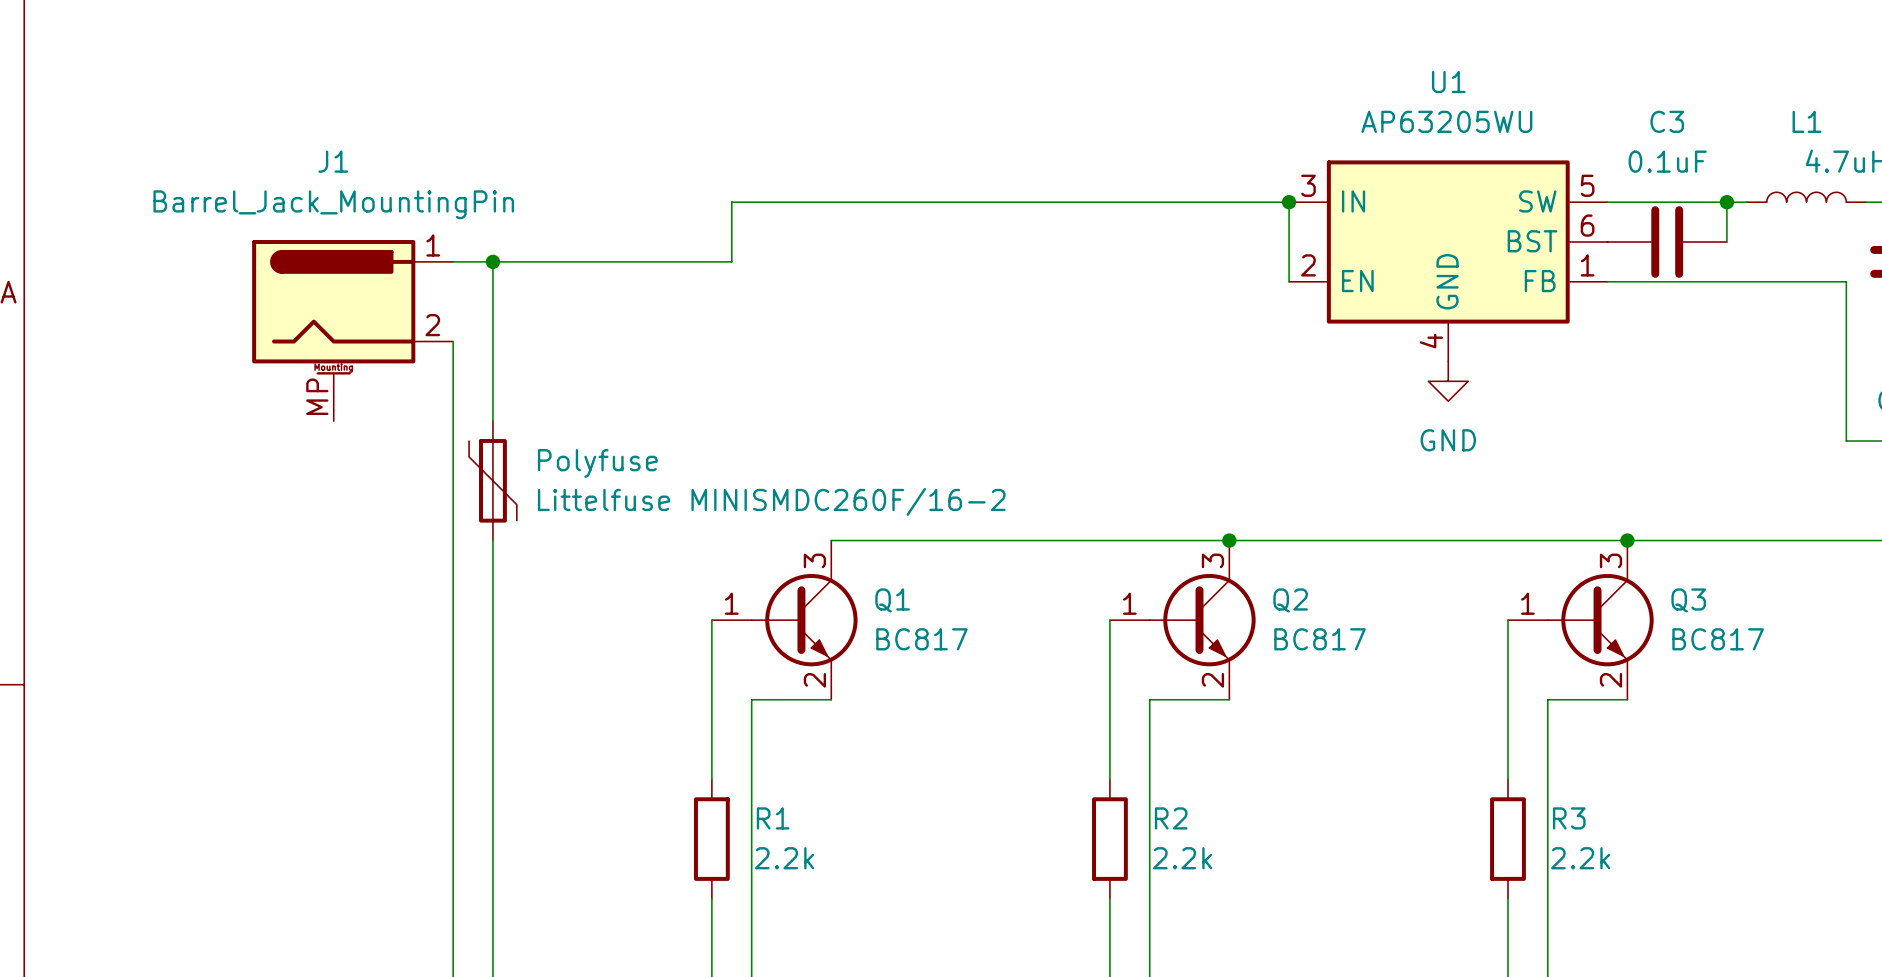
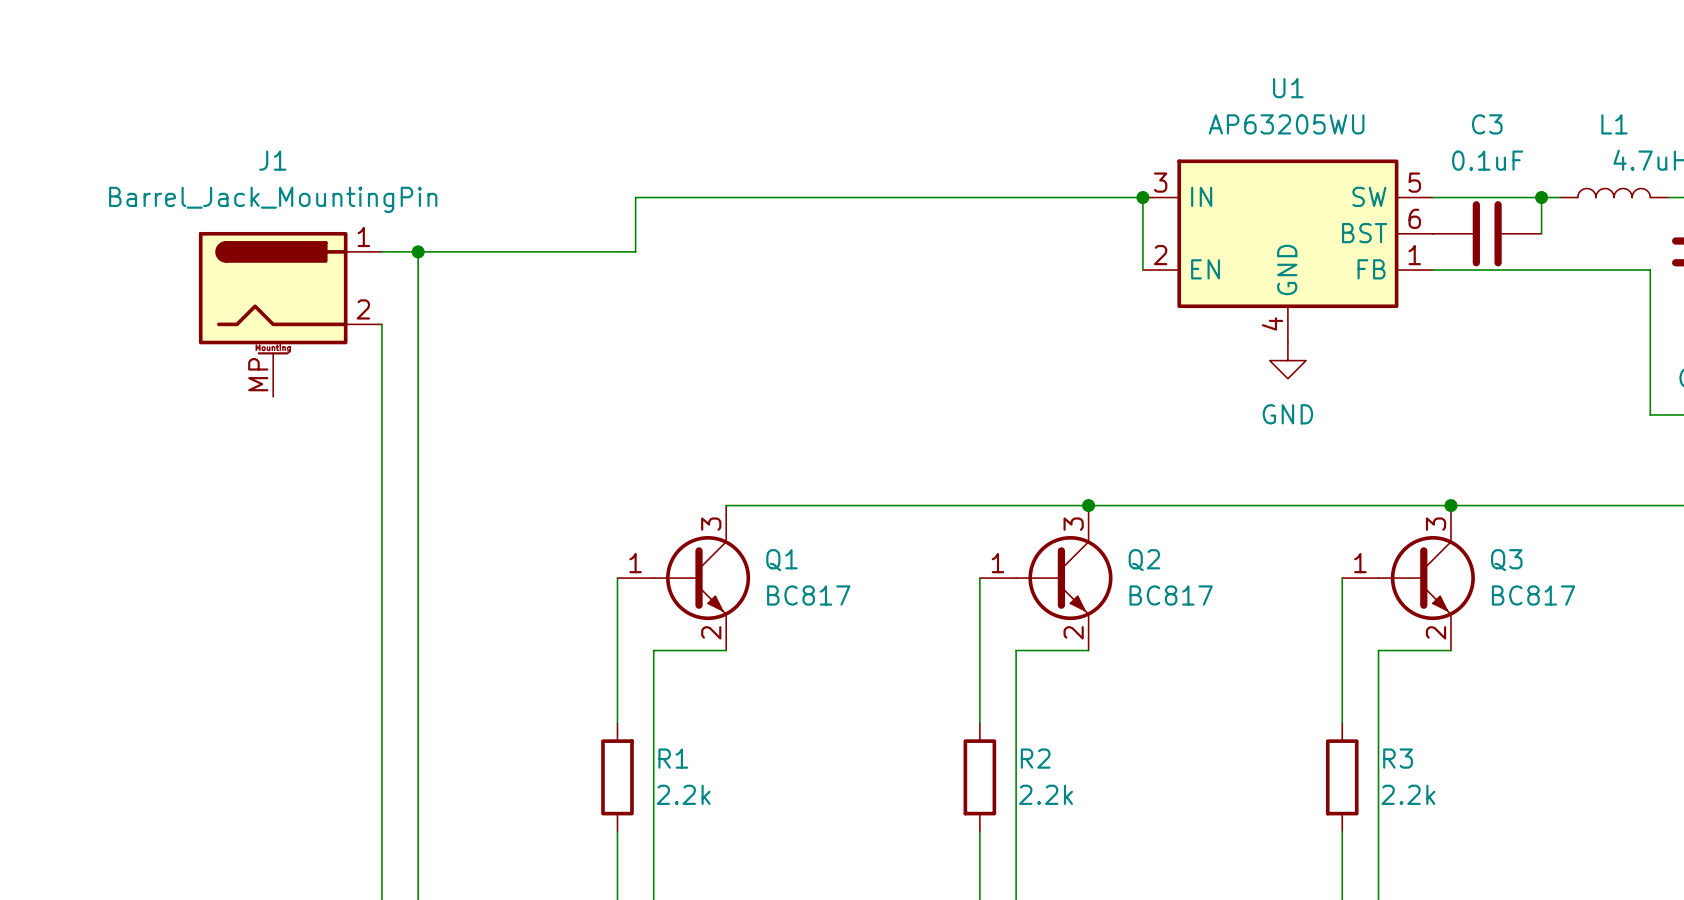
Polyfuse: Littelfuse MINISMDC260F/16-2 (492, 480) -> none

